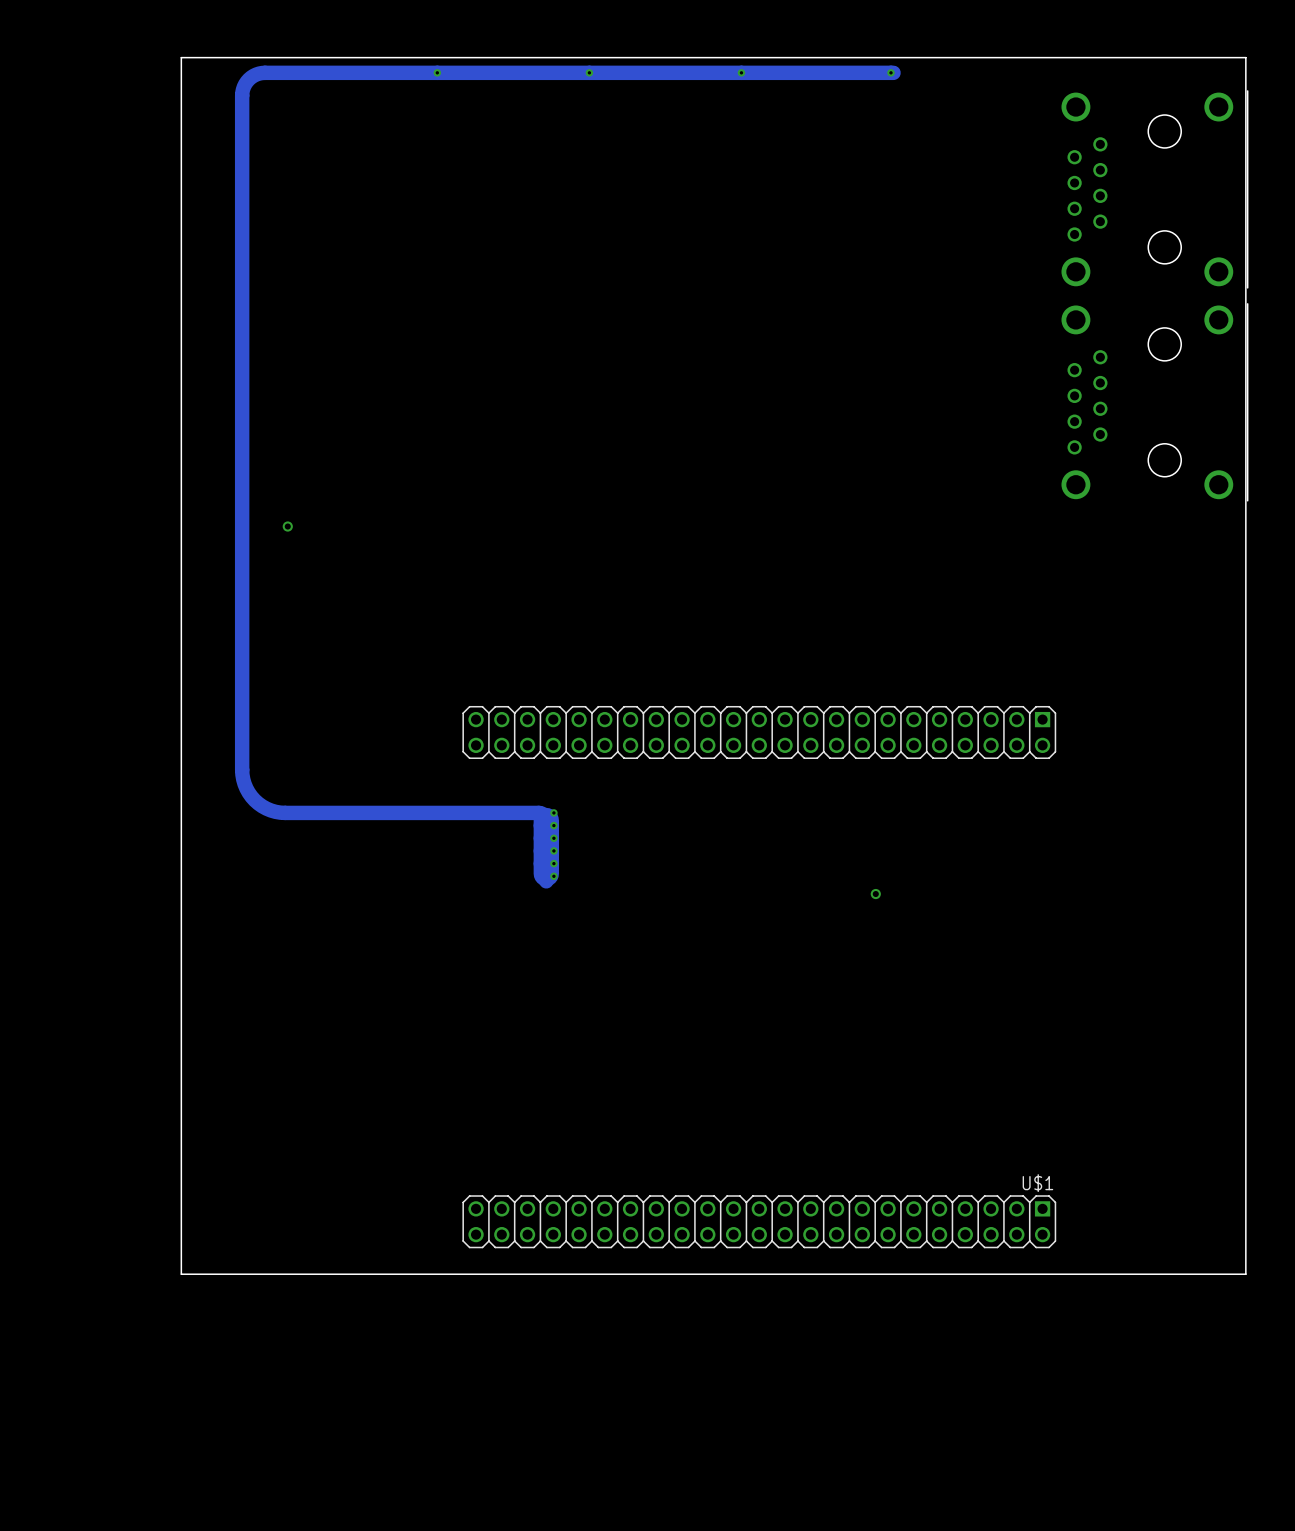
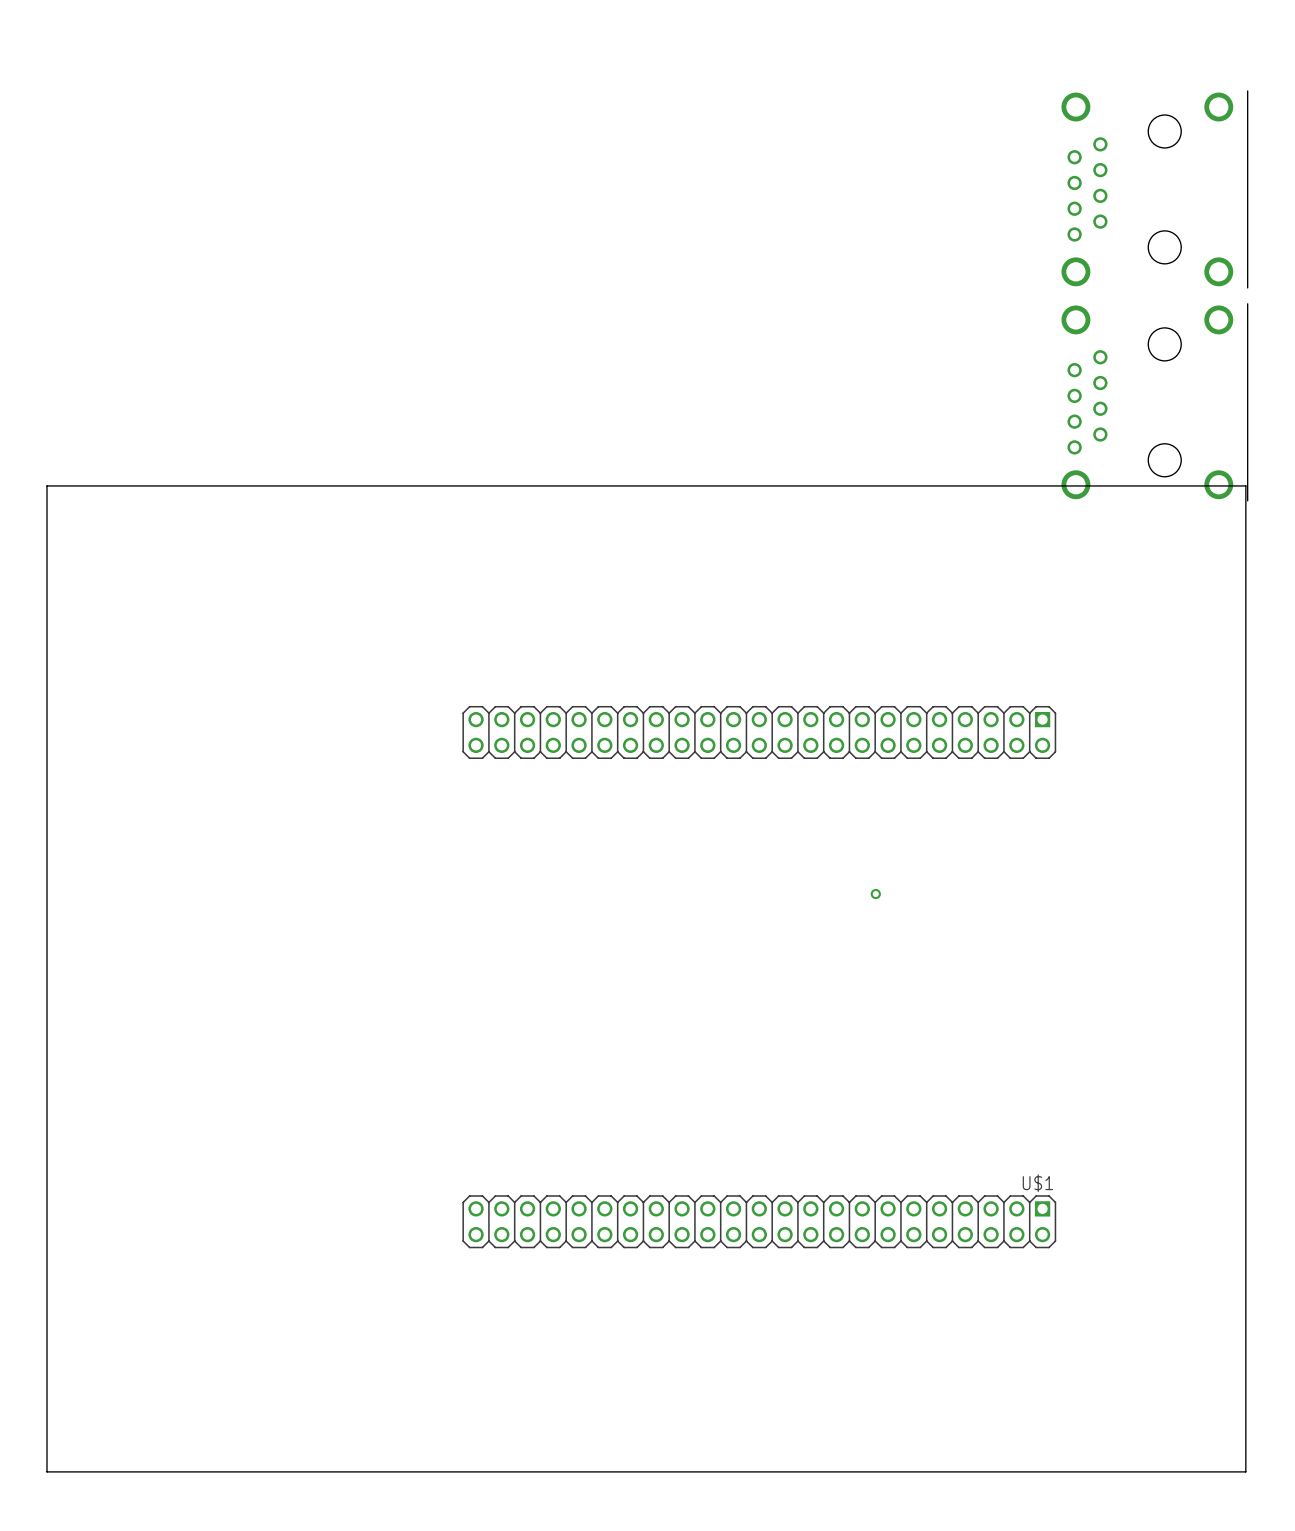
via: (437, 72) -> none
via: (589, 72) -> none
via: (741, 72) -> none
via: (891, 72) -> none
track: (893, 72) (264, 72) (251, 77) (243, 86) (242, 95) (242, 769) (244, 784) (251, 796) (258, 803) (266, 808) (280, 812) (540, 813) (546, 819) (546, 881) -> none
board edge: (1245, 485) (1245, 57) (181, 57) (181, 1274) (1245, 1274) -> (1245, 485) (47, 485) (47, 1471) (1245, 1471) (1245, 1274)
via: (287, 526) -> none
via: (553, 812) -> none
via: (553, 825) -> none
via: (553, 838) -> none
via: (553, 850) -> none
via: (553, 863) -> none
via: (553, 876) -> none

